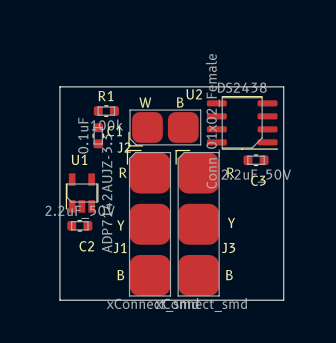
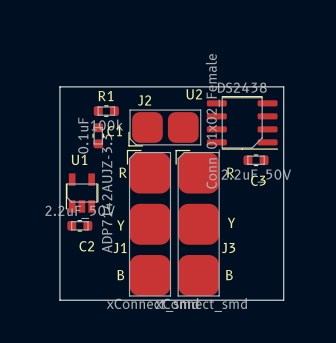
text: W (145, 102) -> none
text: B (180, 102) -> none
J2 name position: J2 (124, 147) -> J2 (144, 100)

